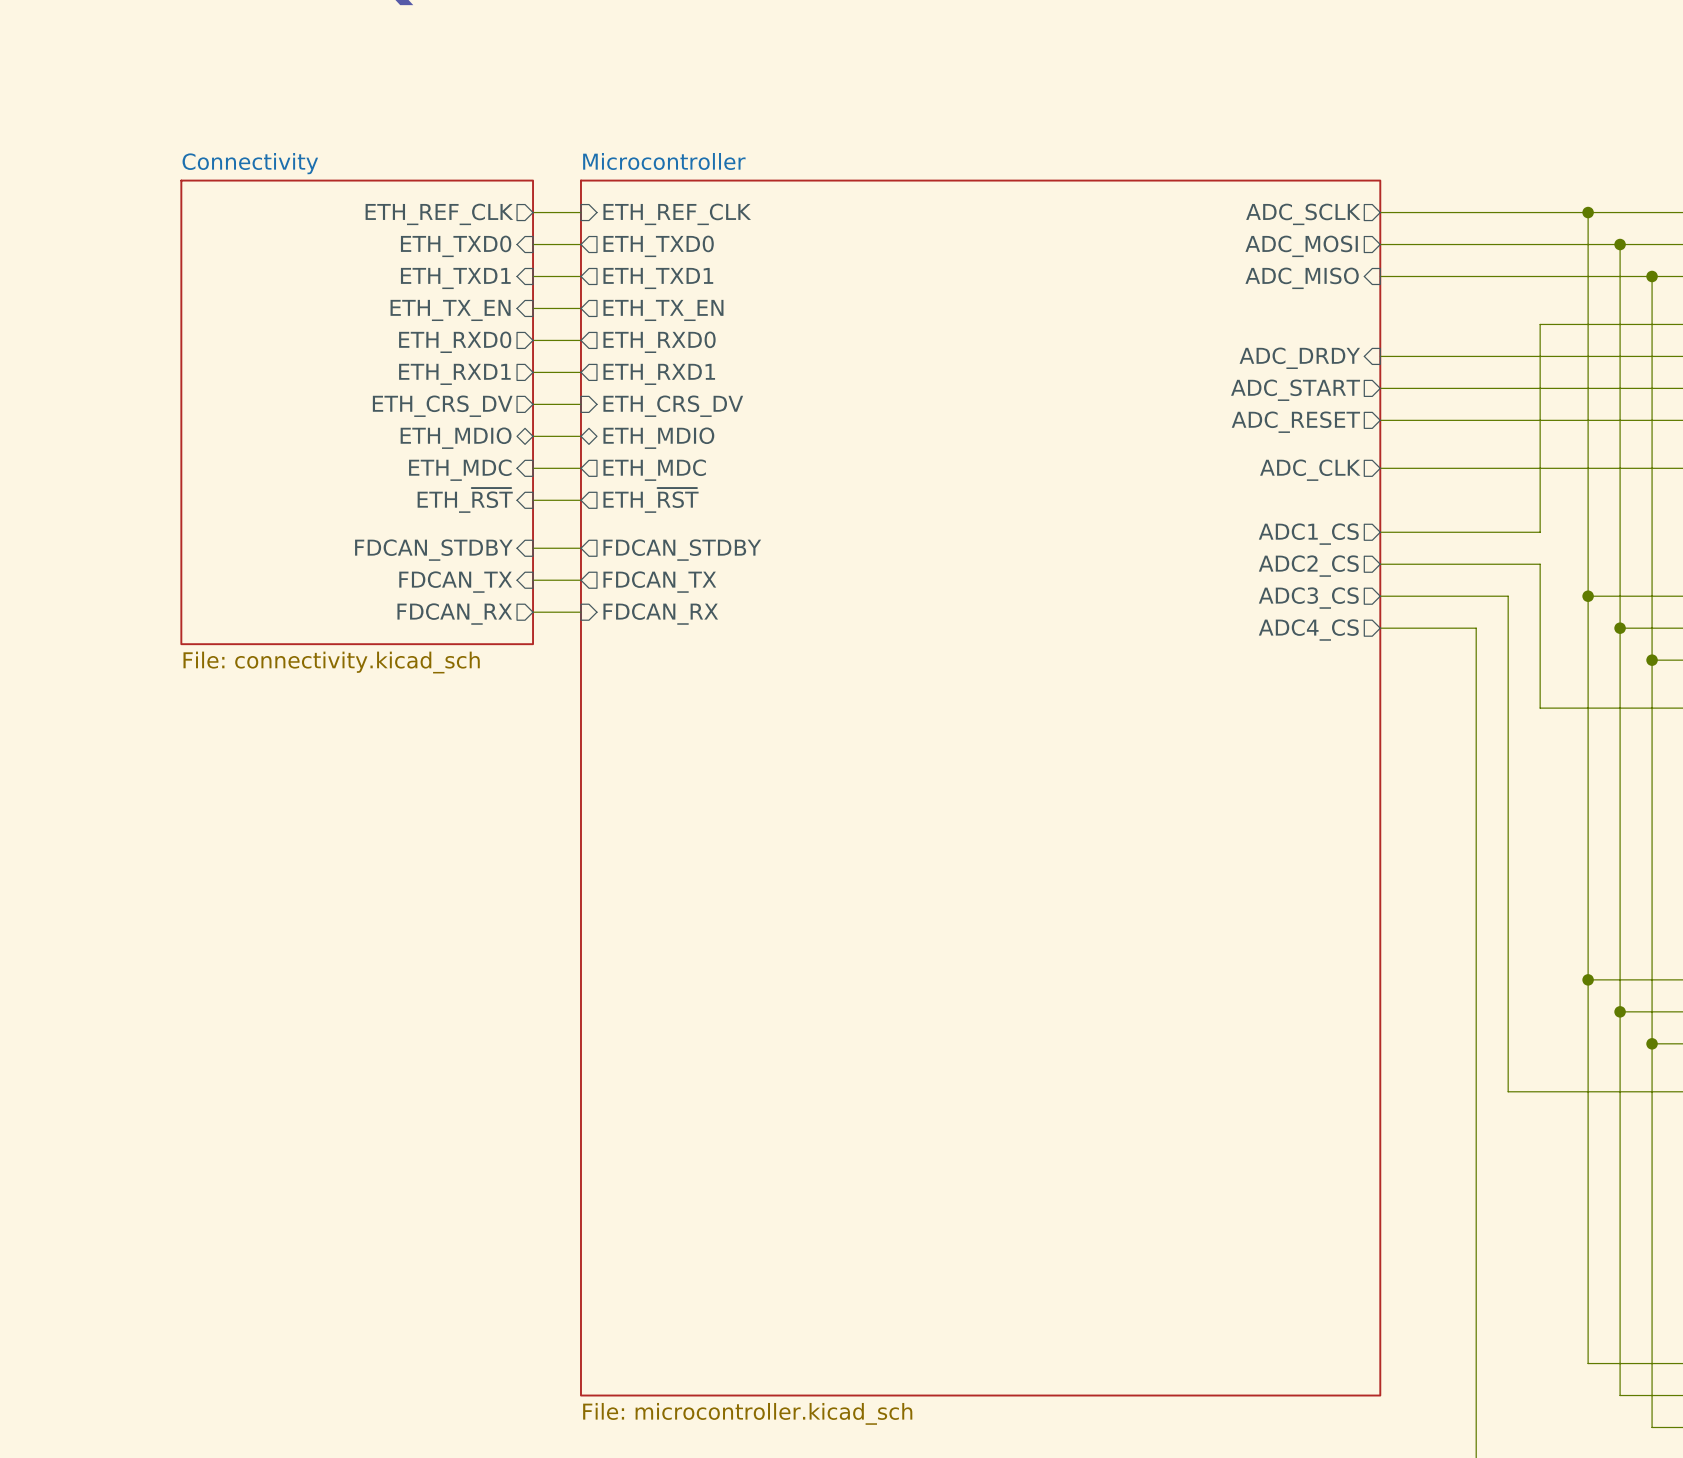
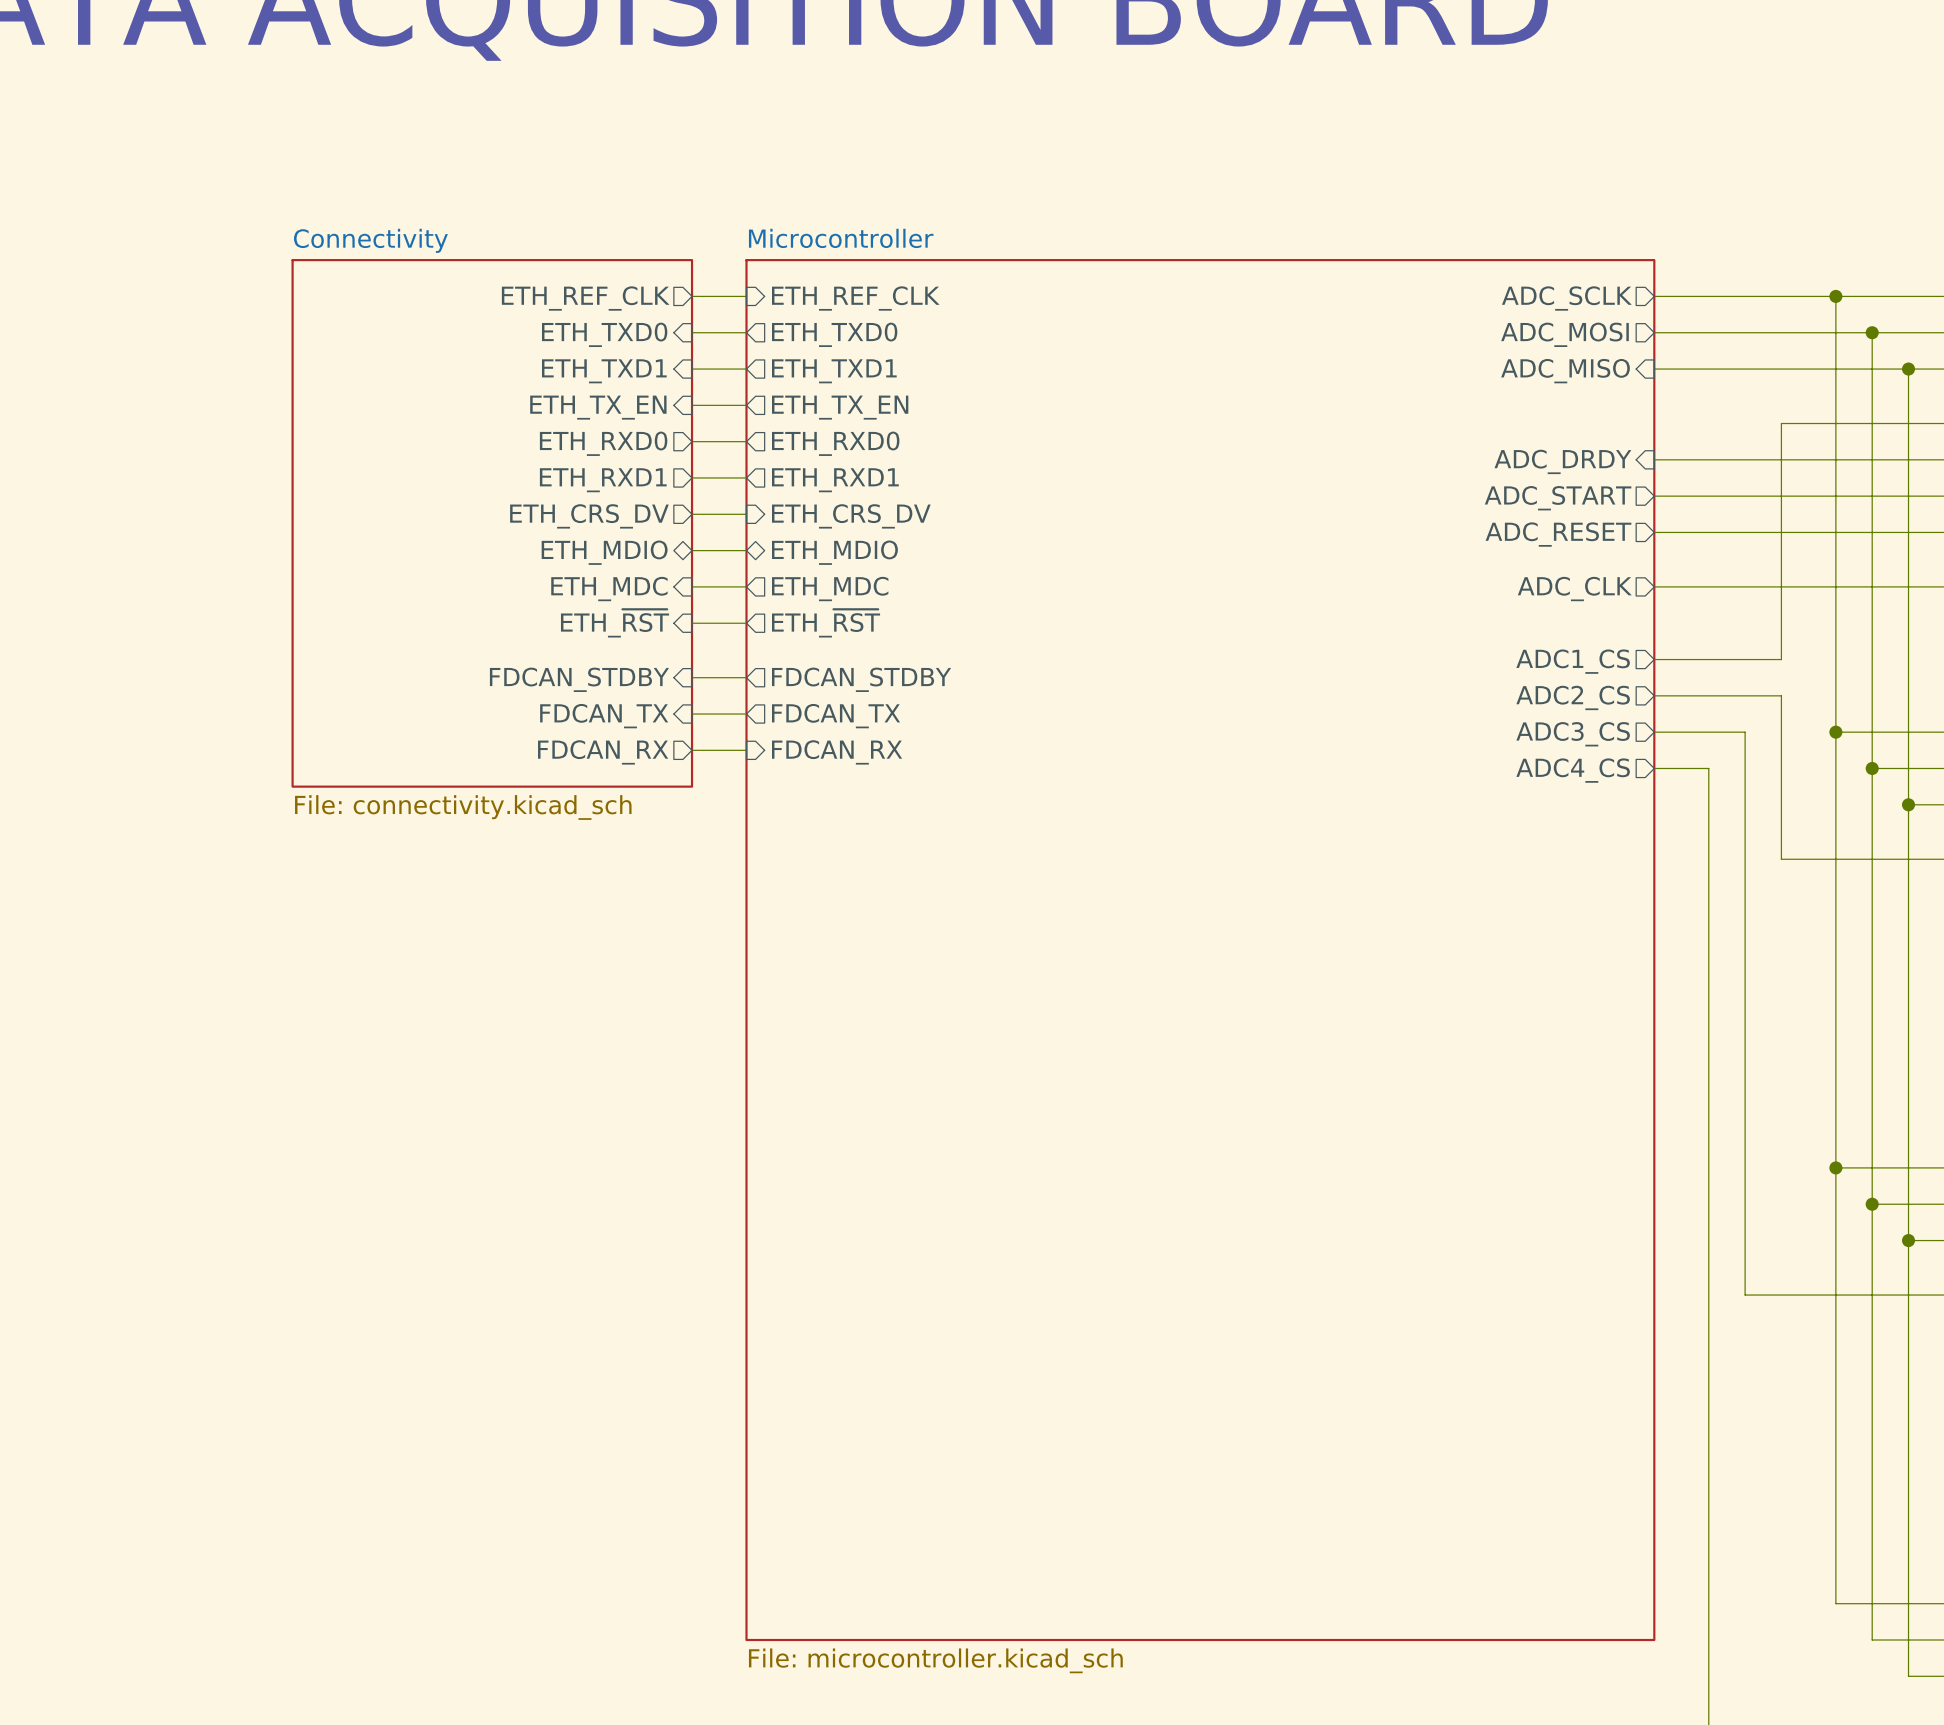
wire: (533, 212) (580, 212) -> (746, 296) (692, 296)
wire: (1380, 212) (1428, 212) -> none
sheet pin position: ETH_REF_CLK (439, 214) -> ETH_REF_CLK (585, 298)
sheet pin position: ETH_REF_CLK (677, 214) -> ETH_REF_CLK (855, 298)
sheet pin position: ADC_SCLK (1303, 214) -> ADC_SCLK (1566, 298)
wire: (533, 244) (580, 244) -> (746, 332) (692, 332)
wire: (1380, 244) (1428, 244) -> none
sheet pin: ETH_TXD0 (456, 246) -> none
sheet pin: none -> ETH_TXD0 (604, 334)
sheet pin: ETH_TXD0 (658, 246) -> none
sheet pin: none -> ETH_TXD0 (834, 334)
sheet pin position: ADC_MOSI (1301, 246) -> ADC_MOSI (1564, 334)
wire: (533, 276) (580, 276) -> (746, 369) (692, 369)
wire: (1380, 276) (1428, 276) -> none
sheet pin: ETH_TXD1 (455, 278) -> none
sheet pin: none -> ETH_TXD1 (604, 371)
sheet pin: ETH_TXD1 (658, 278) -> none
sheet pin: none -> ETH_TXD1 (834, 371)
sheet pin position: ADC_MISO (1302, 278) -> ADC_MISO (1565, 371)
wire: (533, 308) (580, 308) -> (746, 405) (692, 405)
sheet pin: ETH_TX_EN (450, 310) -> none
sheet pin: none -> ETH_TX_EN (598, 407)
sheet pin: ETH_TX_EN (663, 310) -> none
sheet pin: none -> ETH_TX_EN (840, 407)
wire: (533, 340) (580, 340) -> (746, 441) (692, 441)
sheet pin: ETH_RXD0 (455, 342) -> none
sheet pin: none -> ETH_RXD0 (603, 443)
sheet pin: ETH_RXD0 (659, 342) -> none
sheet pin: none -> ETH_RXD0 (835, 443)
wire: (1380, 356) (1428, 356) -> none
sheet pin position: ADC_DRDY (1299, 358) -> ADC_DRDY (1562, 461)
wire: (533, 372) (580, 372) -> (746, 477) (692, 477)
sheet pin: ETH_RXD1 (454, 374) -> none
sheet pin: none -> ETH_RXD1 (603, 480)
sheet pin: ETH_RXD1 (659, 374) -> none
sheet pin: none -> ETH_RXD1 (835, 480)
wire: (1380, 388) (1428, 388) -> none
sheet pin position: ADC_START (1295, 390) -> ADC_START (1558, 498)
wire: (533, 404) (580, 404) -> (746, 514) (692, 514)
sheet pin: ETH_CRS_DV (442, 406) -> none
sheet pin: none -> ETH_CRS_DV (589, 516)
sheet pin: ETH_CRS_DV (673, 406) -> none
sheet pin: none -> ETH_CRS_DV (851, 516)
sheet Connectivity position: (357, 412) -> (492, 523)
wire: (1380, 420) (1428, 420) -> none
sheet pin position: ADC_RESET (1295, 422) -> ADC_RESET (1558, 534)
wire: (533, 436) (580, 436) -> (746, 550) (692, 550)
sheet pin: ETH_MDIO (456, 438) -> none
sheet pin: none -> ETH_MDIO (604, 552)
sheet pin: ETH_MDIO (658, 438) -> none
sheet pin: none -> ETH_MDIO (834, 552)
wire: (533, 468) (580, 468) -> (746, 586) (692, 586)
wire: (1380, 468) (1428, 468) -> none
sheet pin: ETH_MDC (460, 470) -> none
sheet pin: none -> ETH_MDC (609, 589)
sheet pin: ETH_MDC (654, 470) -> none
sheet pin: none -> ETH_MDC (830, 589)
sheet pin position: ADC_CLK (1310, 470) -> ADC_CLK (1574, 589)
sheet pin position: ETH_~{RST} (465, 500) -> ETH_~{RST} (615, 623)
wire: (533, 500) (580, 500) -> (746, 623) (692, 623)
sheet pin position: ETH_~{RST} (651, 500) -> ETH_~{RST} (826, 623)
wire: (1380, 532) (1428, 532) -> none
sheet pin position: ADC1_CS (1308, 534) -> ADC1_CS (1573, 661)
wire: (533, 548) (580, 548) -> (746, 677) (692, 677)
sheet pin: FDCAN_STDBY (433, 550) -> none
sheet pin: none -> FDCAN_STDBY (579, 679)
sheet pin: FDCAN_STDBY (682, 550) -> none
sheet pin: none -> FDCAN_STDBY (861, 679)
wire: (1380, 564) (1428, 564) -> none
sheet pin position: ADC2_CS (1308, 566) -> ADC2_CS (1573, 697)
wire: (533, 580) (580, 580) -> (746, 714) (692, 714)
sheet pin: FDCAN_TX (455, 582) -> none
sheet pin: none -> FDCAN_TX (604, 716)
sheet pin: FDCAN_TX (659, 582) -> none
sheet pin: none -> FDCAN_TX (836, 716)
wire: (1380, 596) (1428, 596) -> none
sheet pin position: ADC3_CS (1308, 598) -> ADC3_CS (1573, 734)
wire: (533, 612) (580, 612) -> (746, 750) (692, 750)
sheet pin: FDCAN_RX (454, 614) -> none
sheet pin: none -> FDCAN_RX (603, 752)
sheet pin: FDCAN_RX (660, 614) -> none
sheet pin: none -> FDCAN_RX (837, 752)
wire: (1380, 628) (1428, 628) -> none
sheet pin position: ADC4_CS (1308, 630) -> ADC4_CS (1573, 770)
sheet Microcontroller position: (980, 788) -> (1200, 950)

